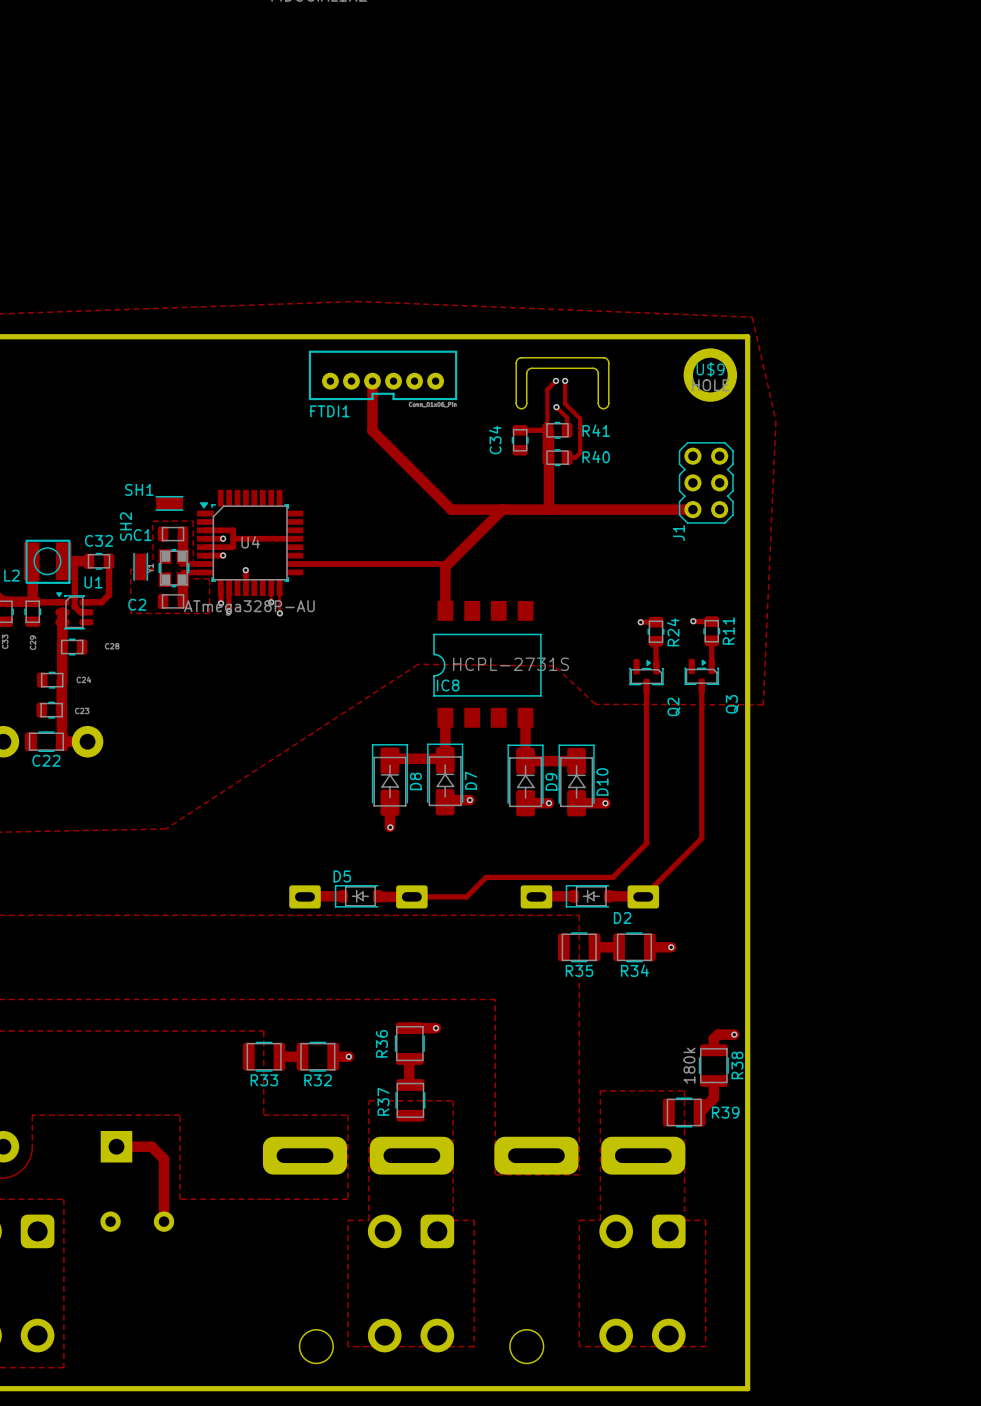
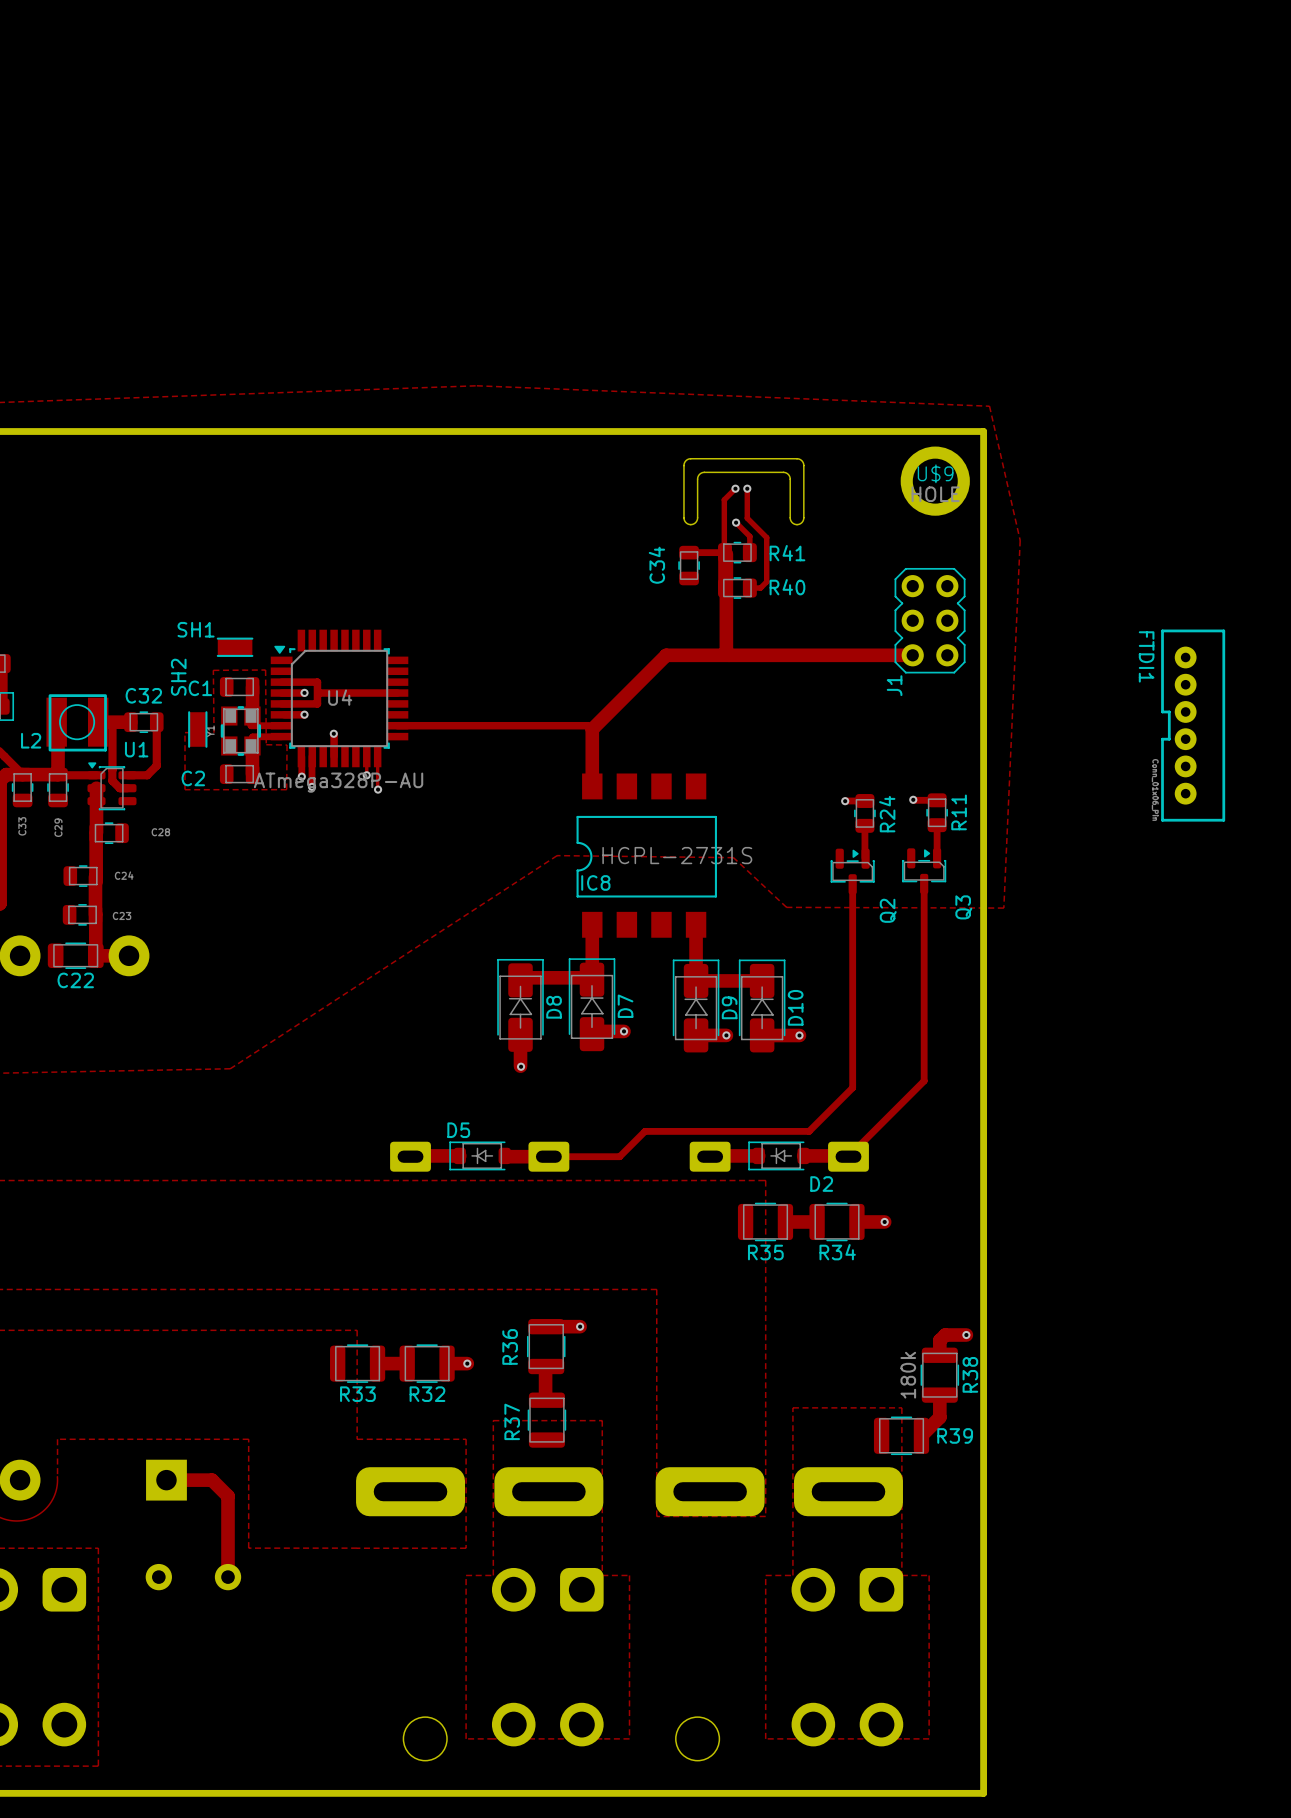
FTDI1 rotation: 0° (383, 375) -> 90° clockwise (1193, 725)
FTDI1 position: (383, 375) -> (1193, 725)
track: (372, 381) (372, 430) (451, 509) (502, 509) -> none

